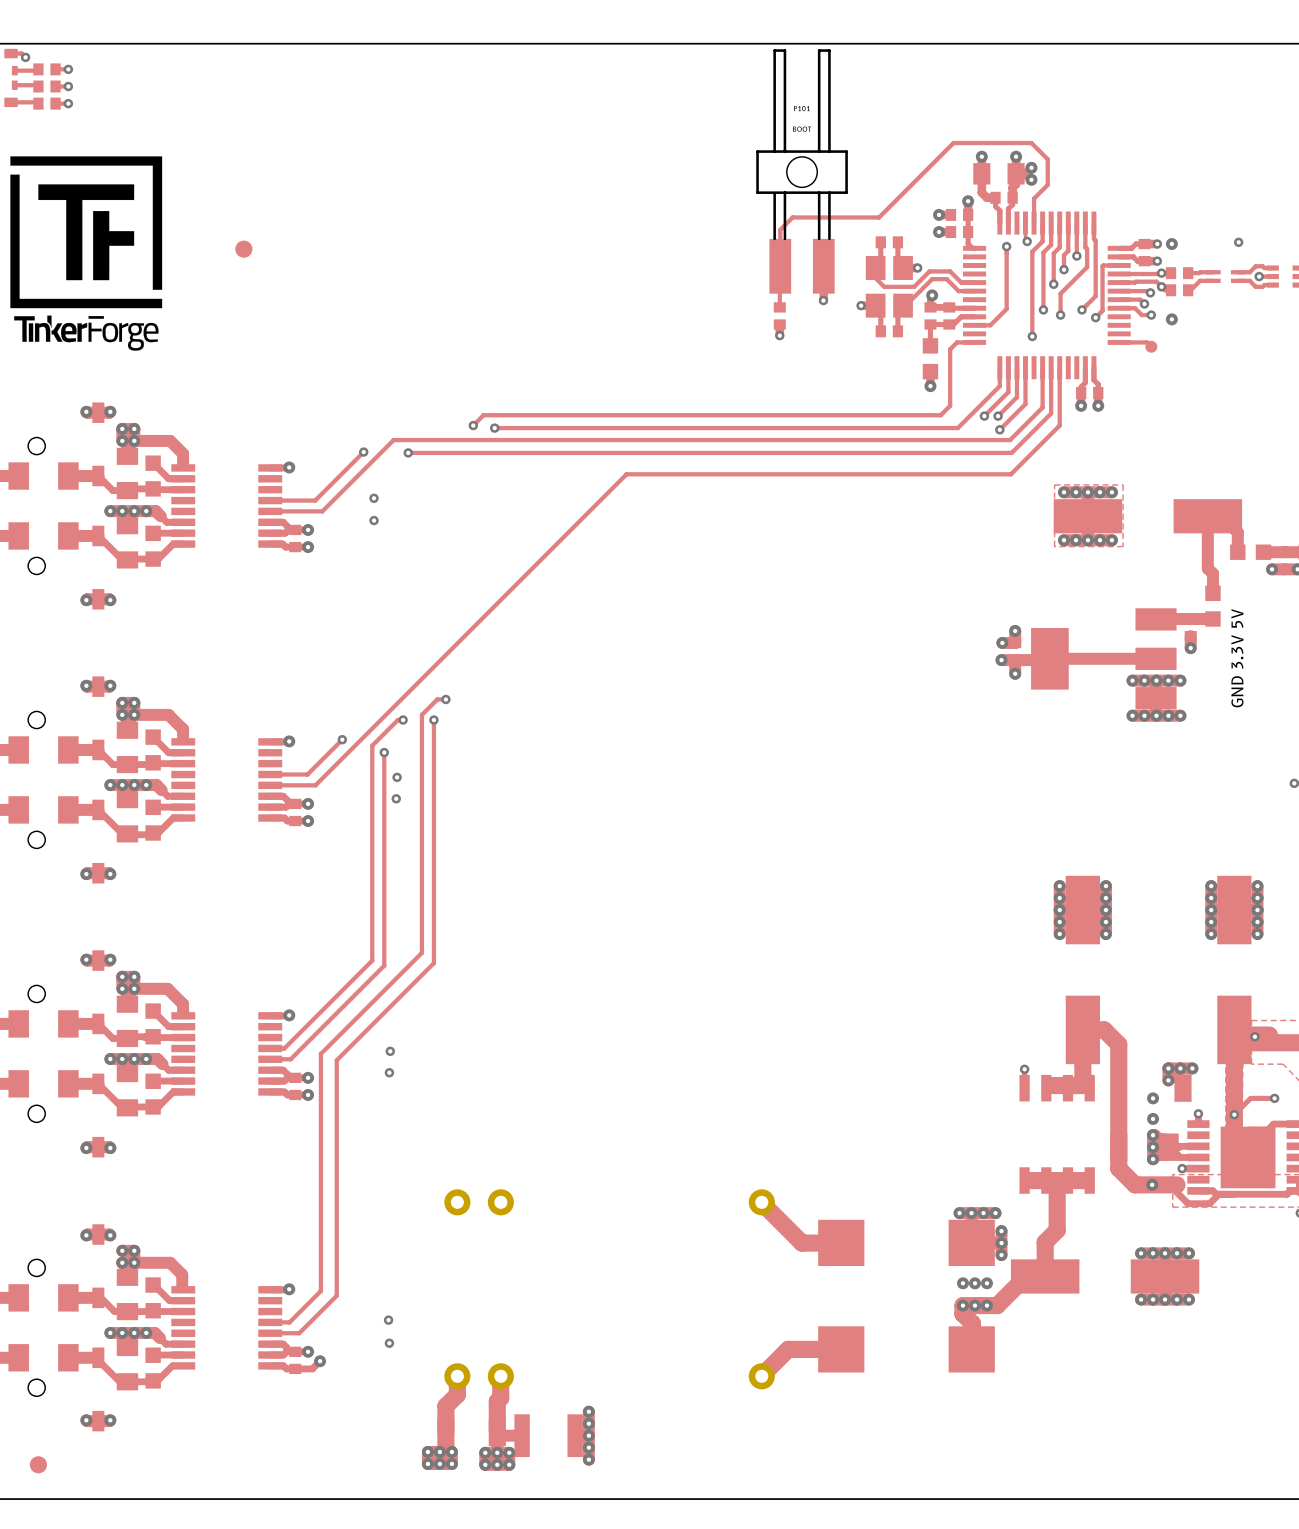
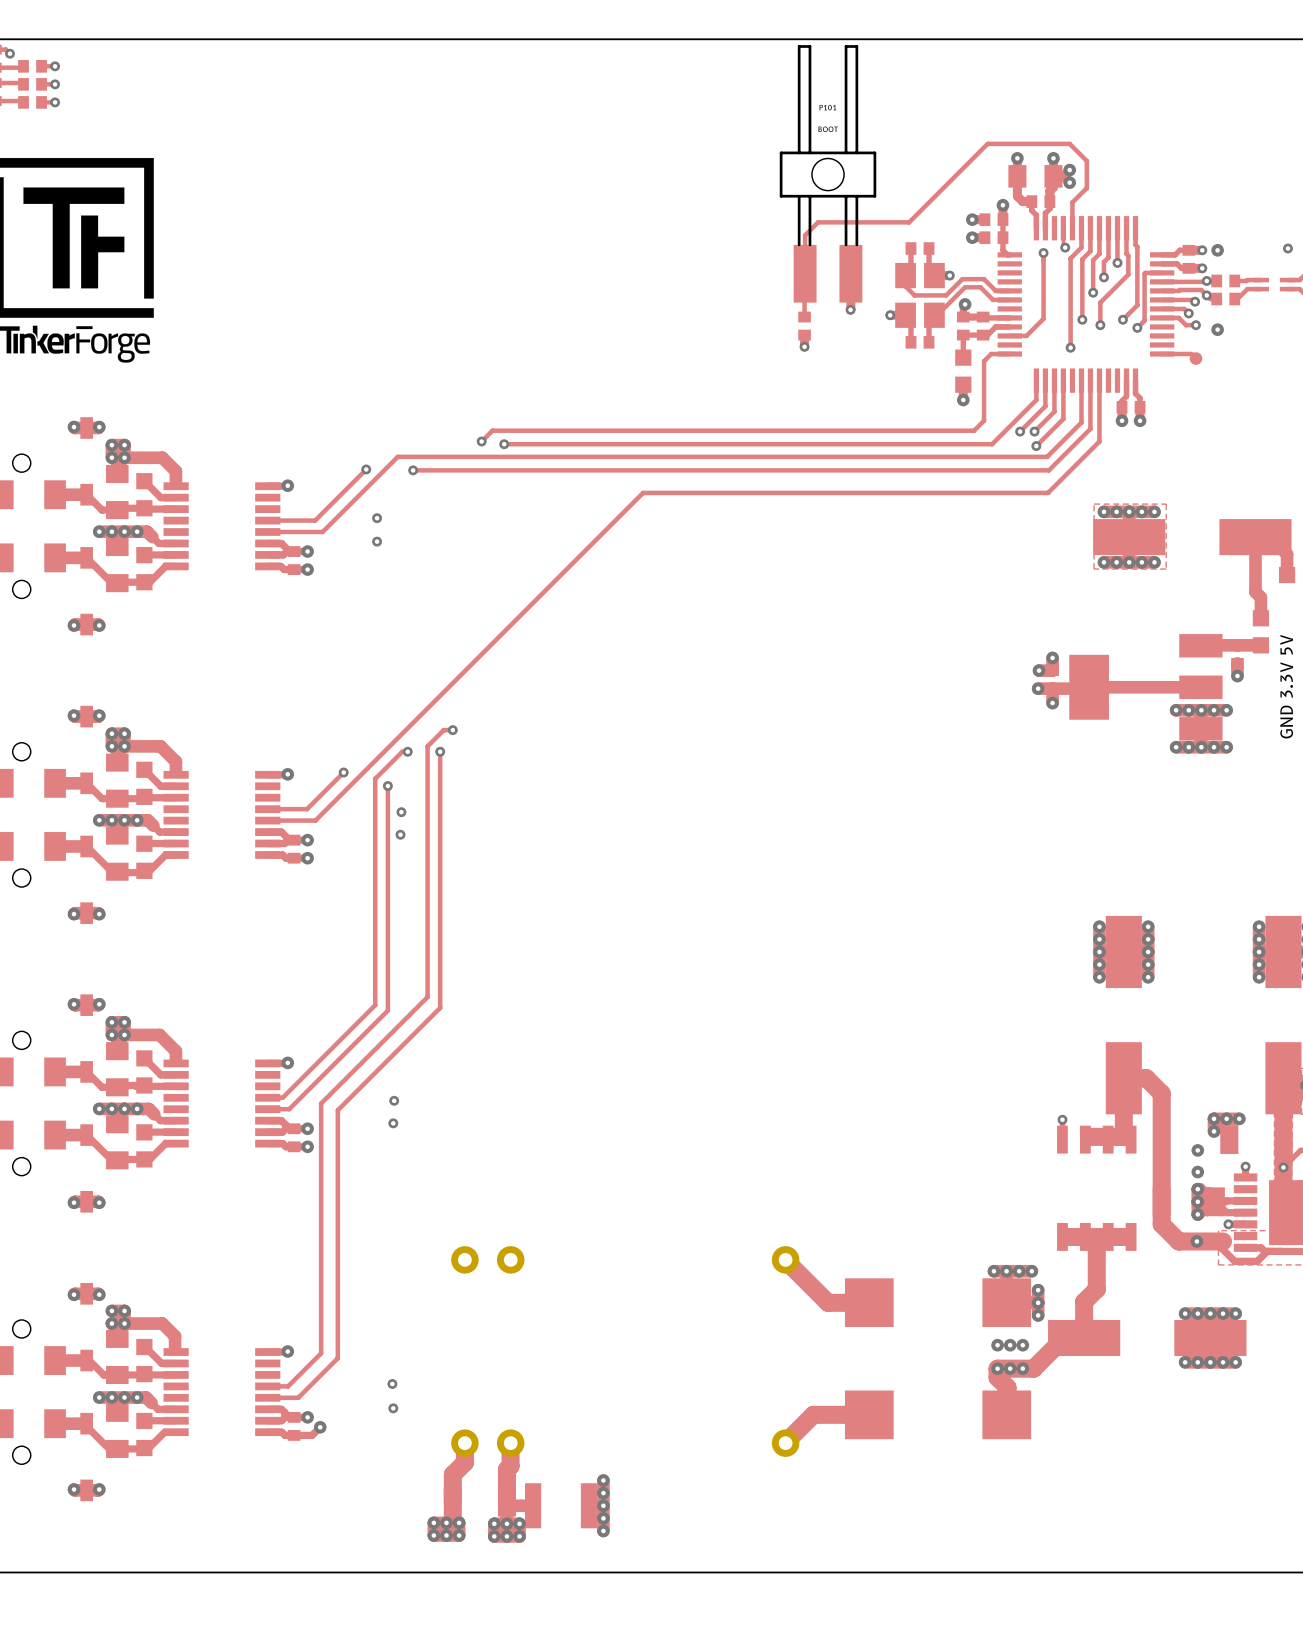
part: (243, 249) -> none
part: (38, 1464) -> none

